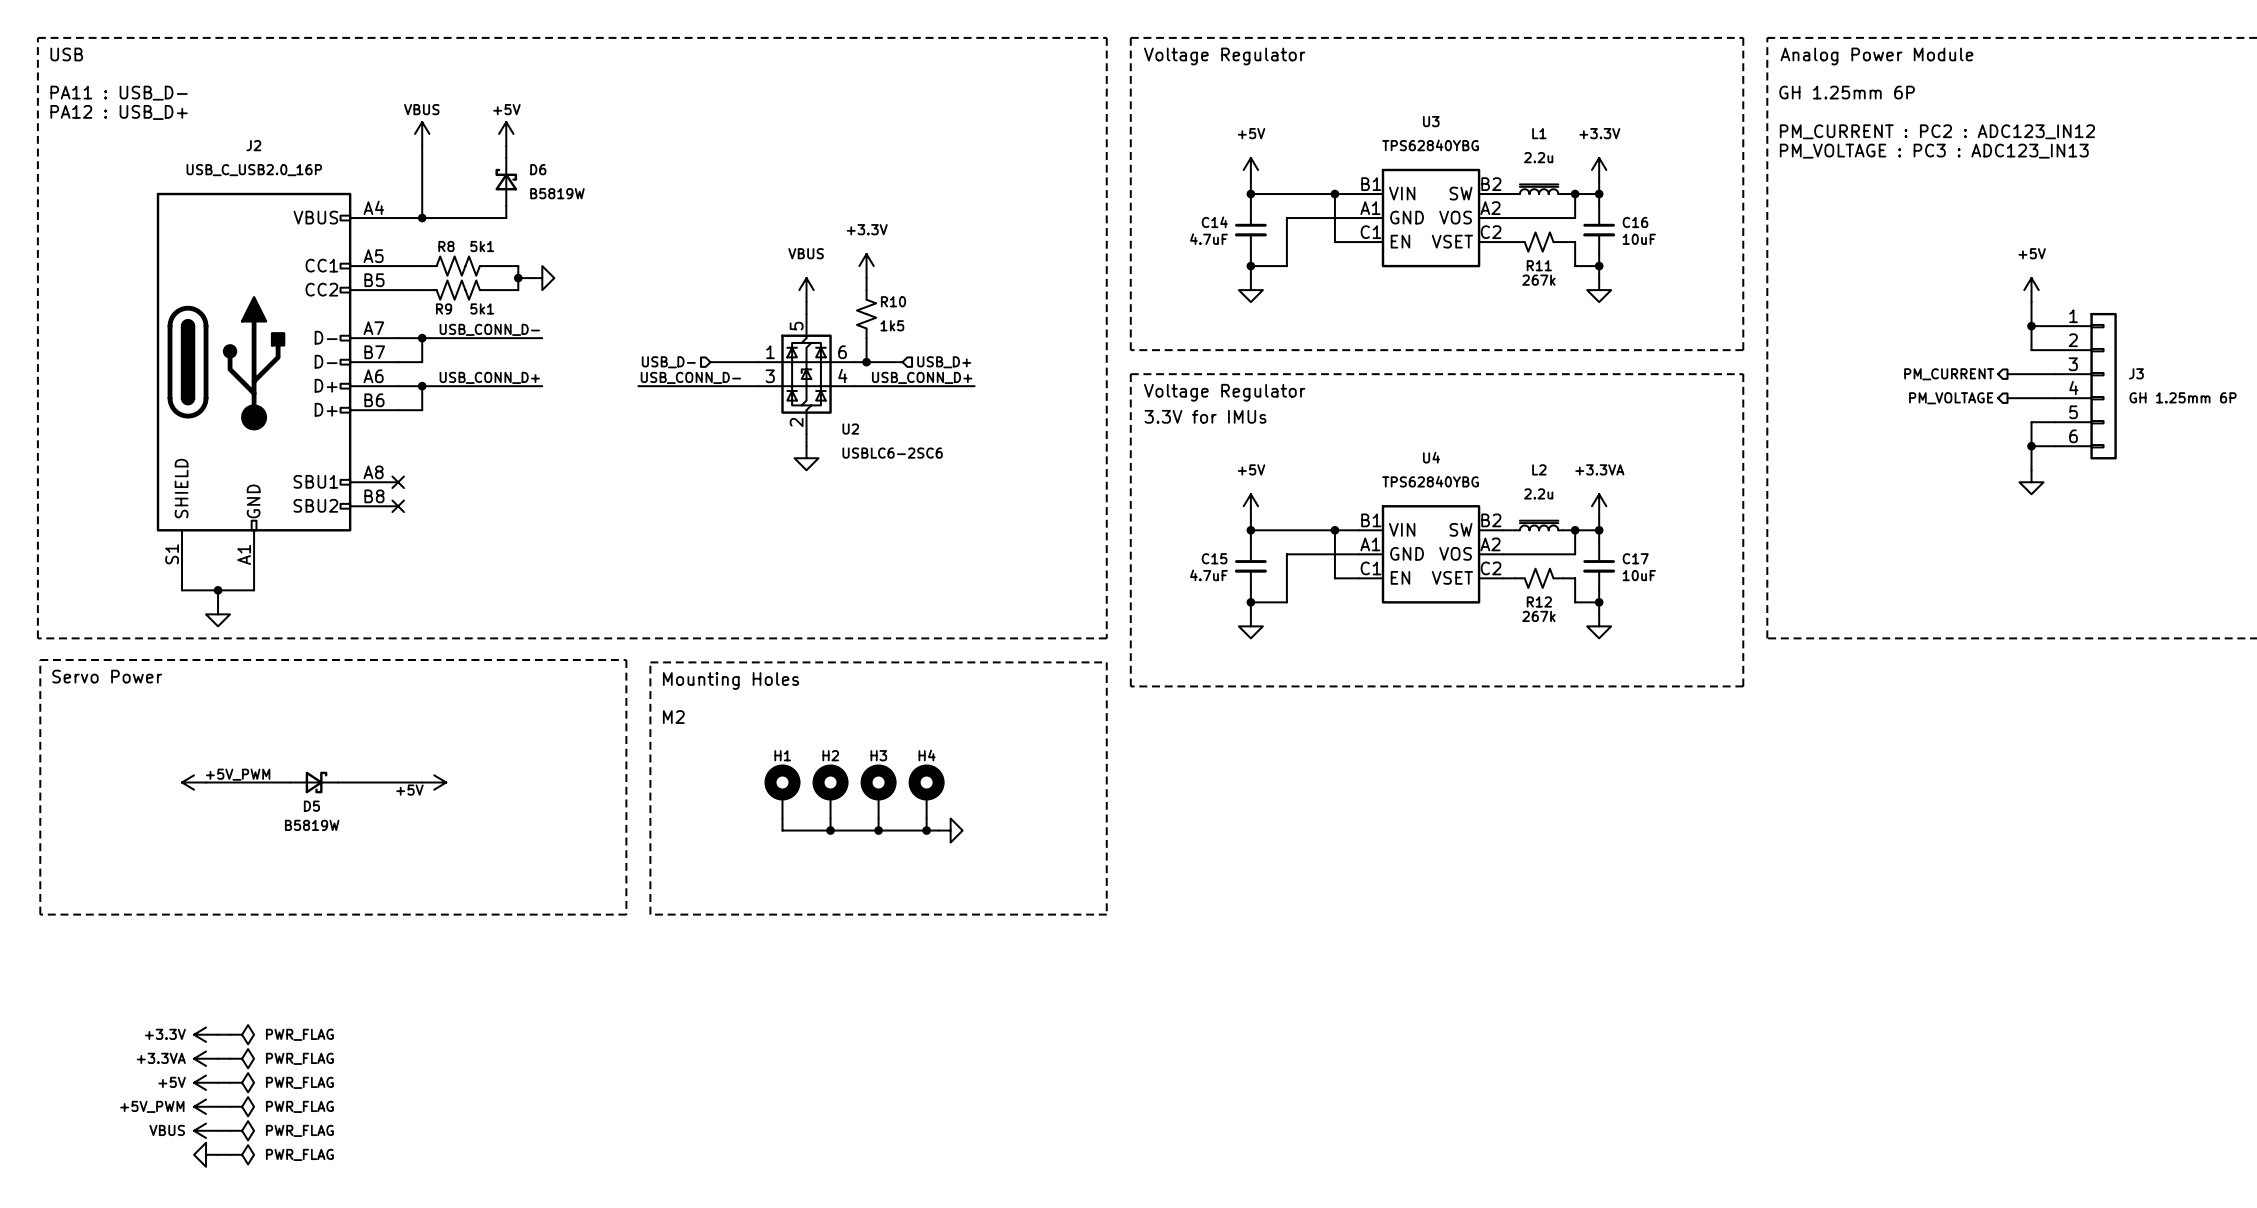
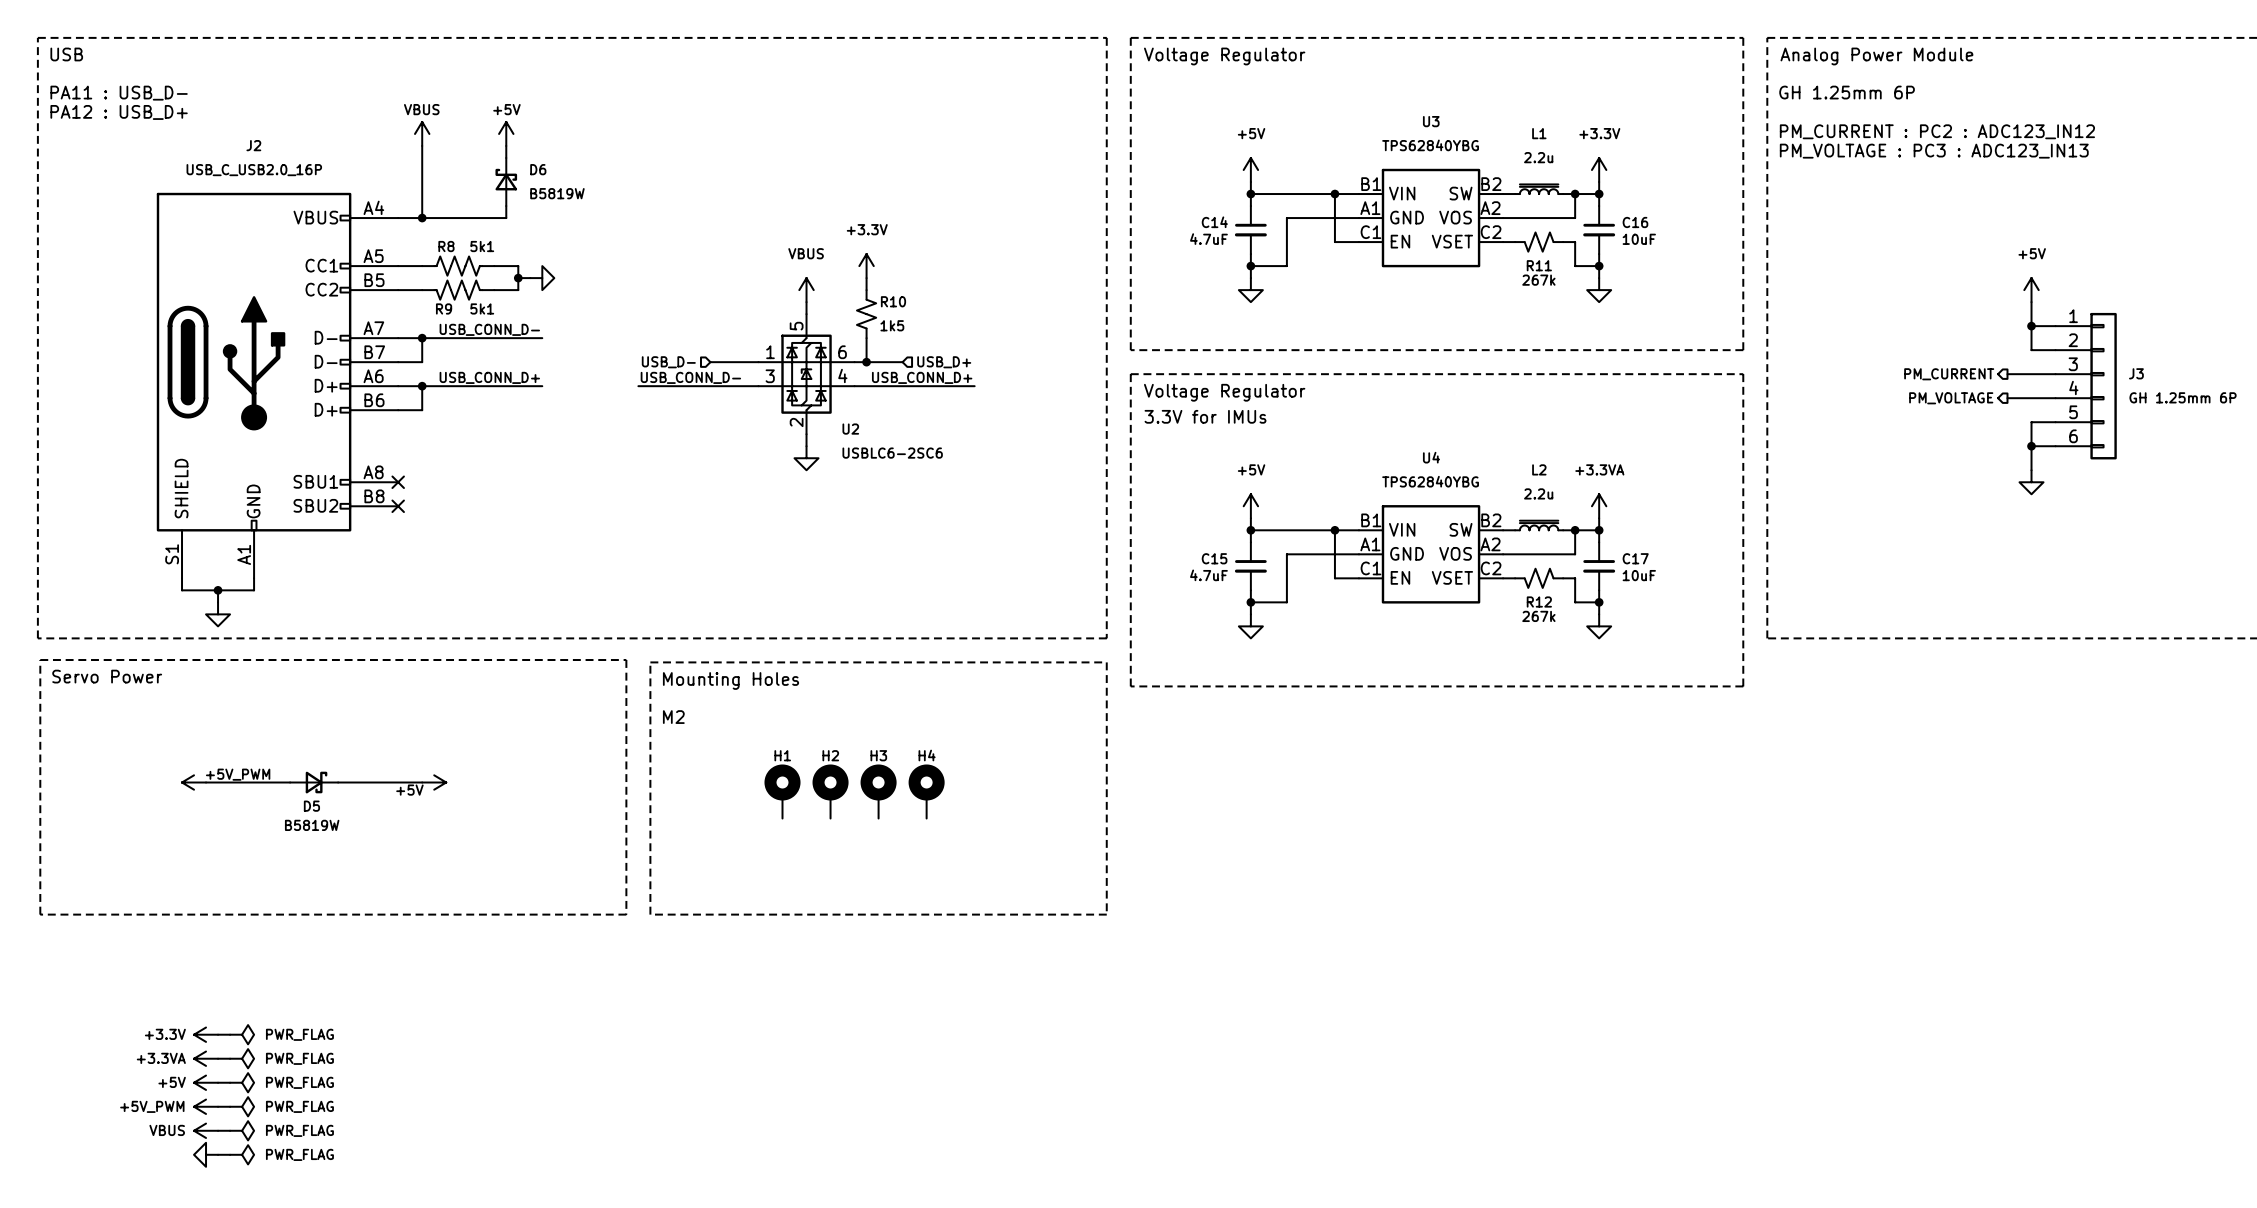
wire: (782, 818) (782, 830) (938, 830) -> none
wire: (830, 818) (830, 830) -> none
wire: (878, 818) (878, 830) -> none
wire: (926, 818) (926, 830) -> none
junction: (830, 830) -> none
junction: (878, 830) -> none
junction: (926, 830) -> none
power symbol: (950, 830) -> none

